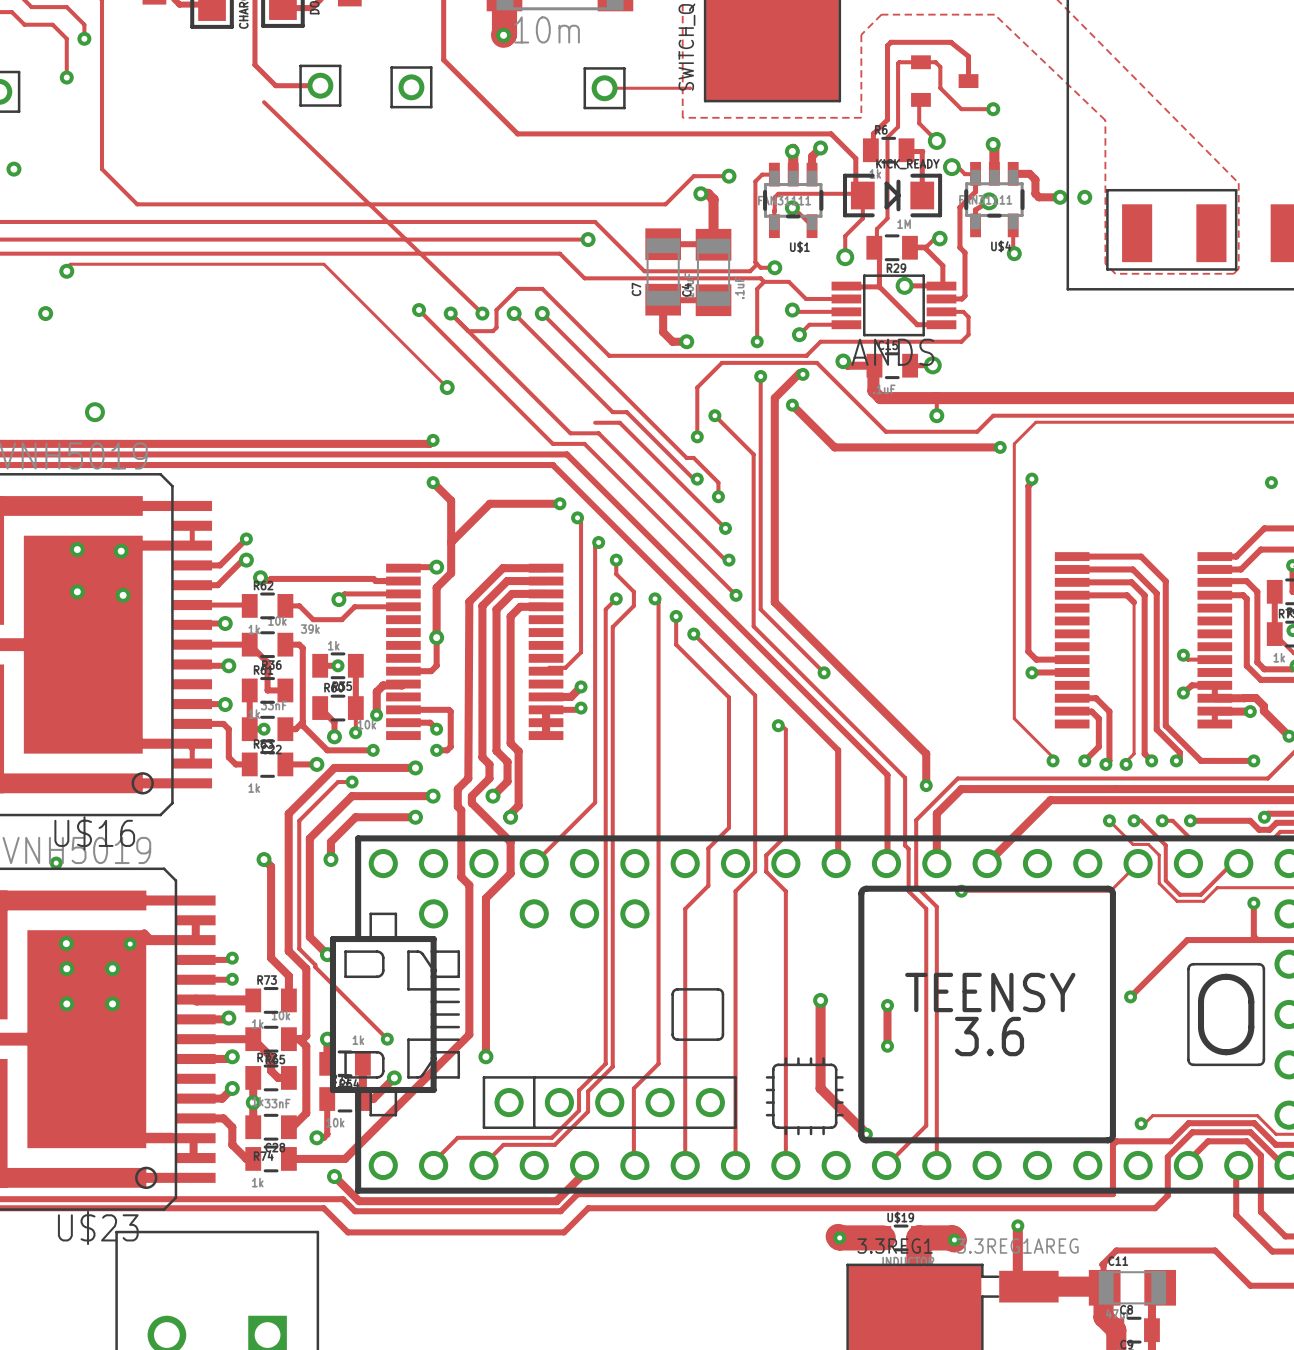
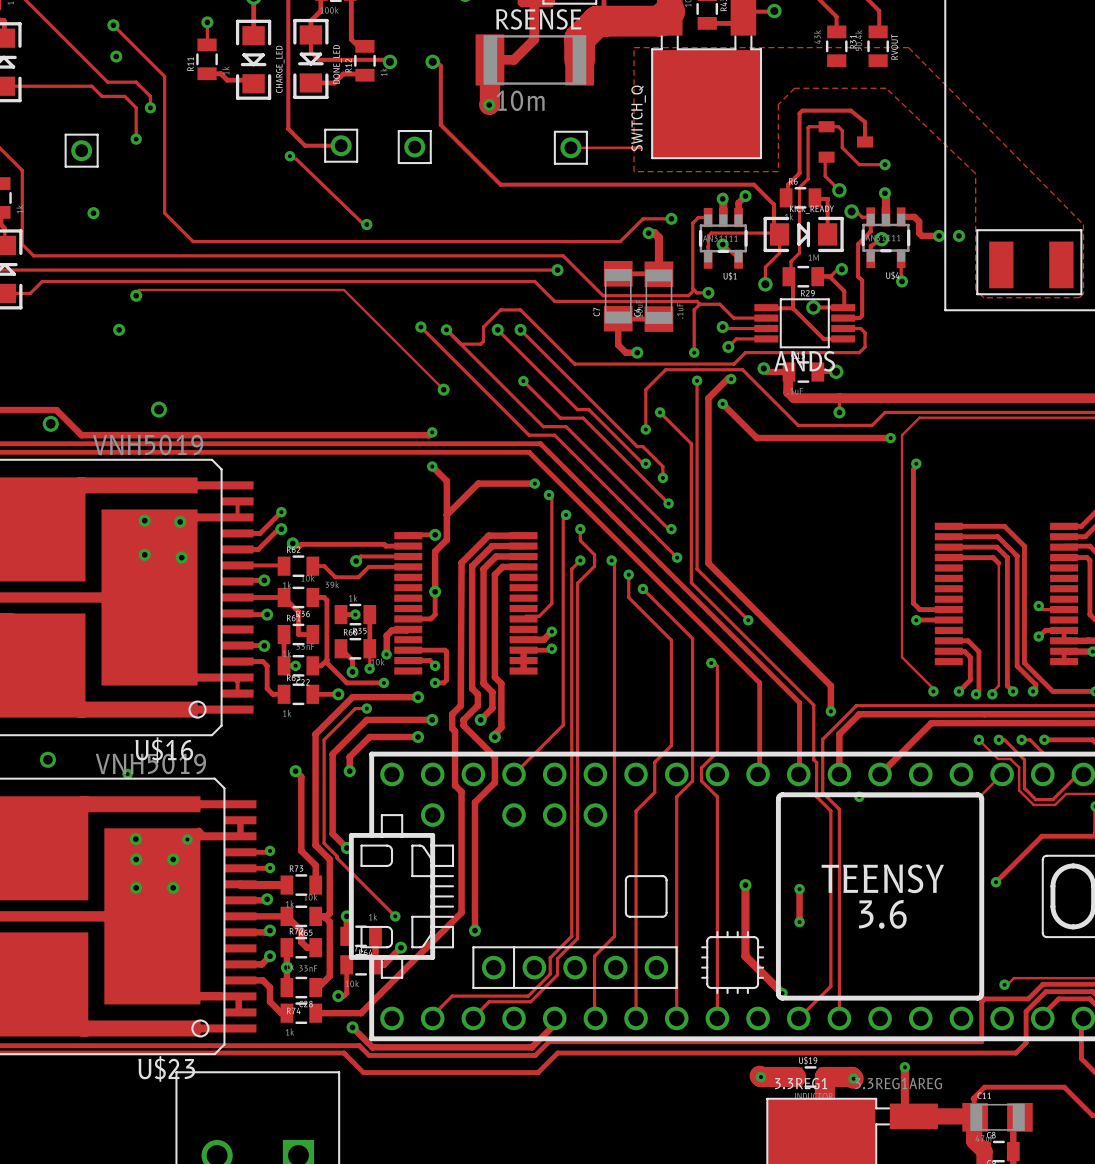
track: none -> (289, 156) (296, 159) (363, 224) (366, 224)
via: none -> (289, 156)
track: (264, 102) (482, 313) -> none
via: none -> (366, 224)
via: (482, 313) -> none
track: none -> (523, 381) (560, 418) (563, 418)
via: none -> (523, 381)

